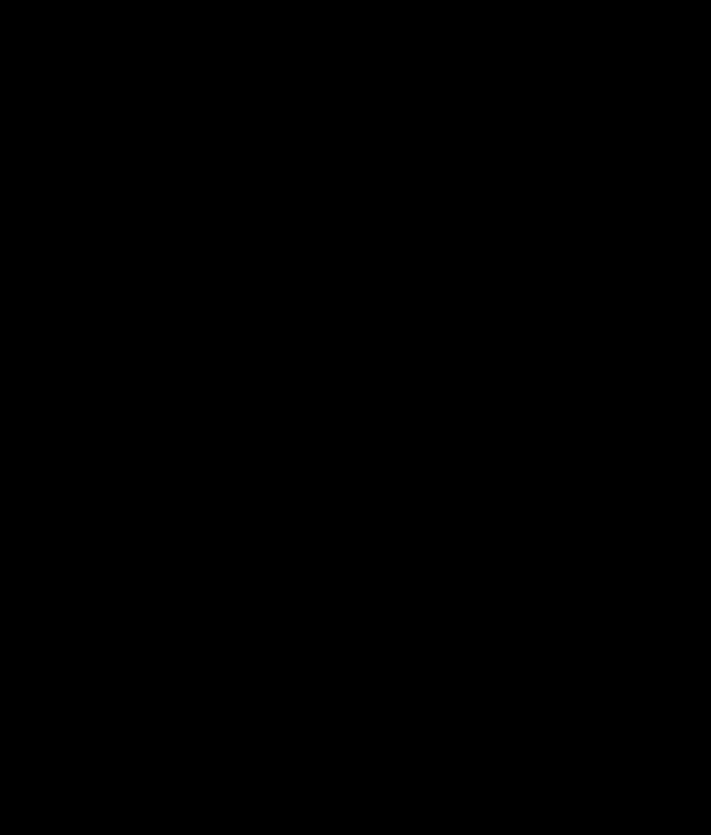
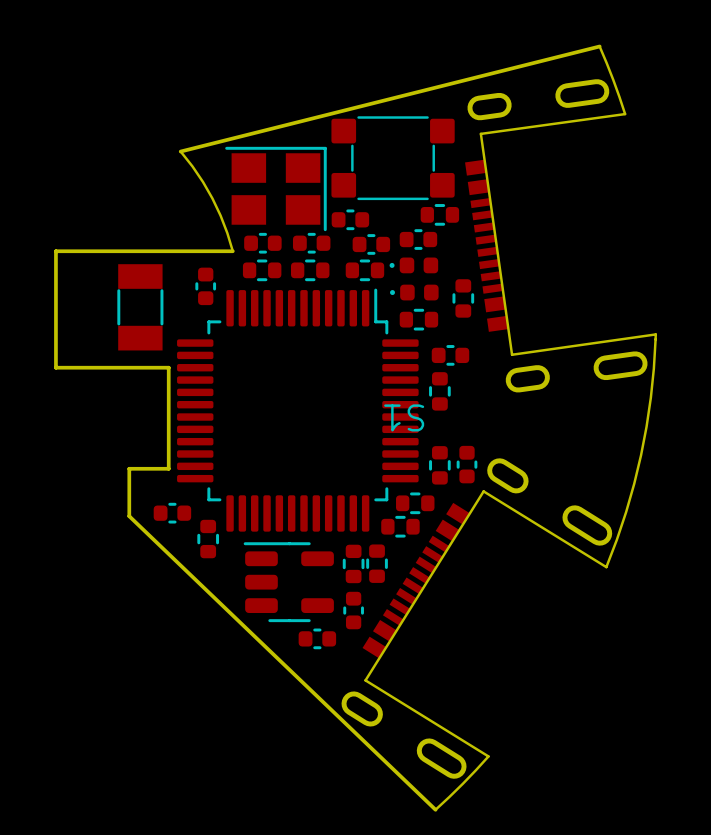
board edge: none -> (599, 46) (180, 151) (212, 198) (232, 251) (55, 251) (55, 367) (168, 367) (168, 468) (129, 468) (129, 516) (435, 809) (488, 756) (365, 680) (483, 491) (606, 567) (626, 512) (641, 455) (650, 397) (655, 334) (512, 354) (480, 133) (625, 114) (599, 46)
S1: none -> (393, 158)
part: none -> (275, 188)
part: none -> (439, 214)
part: none -> (350, 219)
part: none -> (556, 235)
part: none -> (418, 239)
part: none -> (262, 243)
part: none -> (311, 243)
part: none -> (371, 244)
part: none -> (413, 265)
part: none -> (262, 270)
part: none -> (310, 270)
part: none -> (364, 270)
part: none -> (205, 286)
part: none -> (414, 292)
part: none -> (463, 298)
part: none -> (140, 307)
part: none -> (418, 319)
part: none -> (450, 355)
part: none -> (439, 391)
part: none -> (297, 410)
part: none -> (467, 464)
part: none -> (439, 465)
part: none -> (415, 503)
part: none -> (172, 513)
part: none -> (400, 526)
part: none -> (208, 539)
part: none -> (353, 563)
part: none -> (377, 563)
part: none -> (288, 582)
part: none -> (353, 610)
part: none -> (476, 618)
part: none -> (317, 638)

